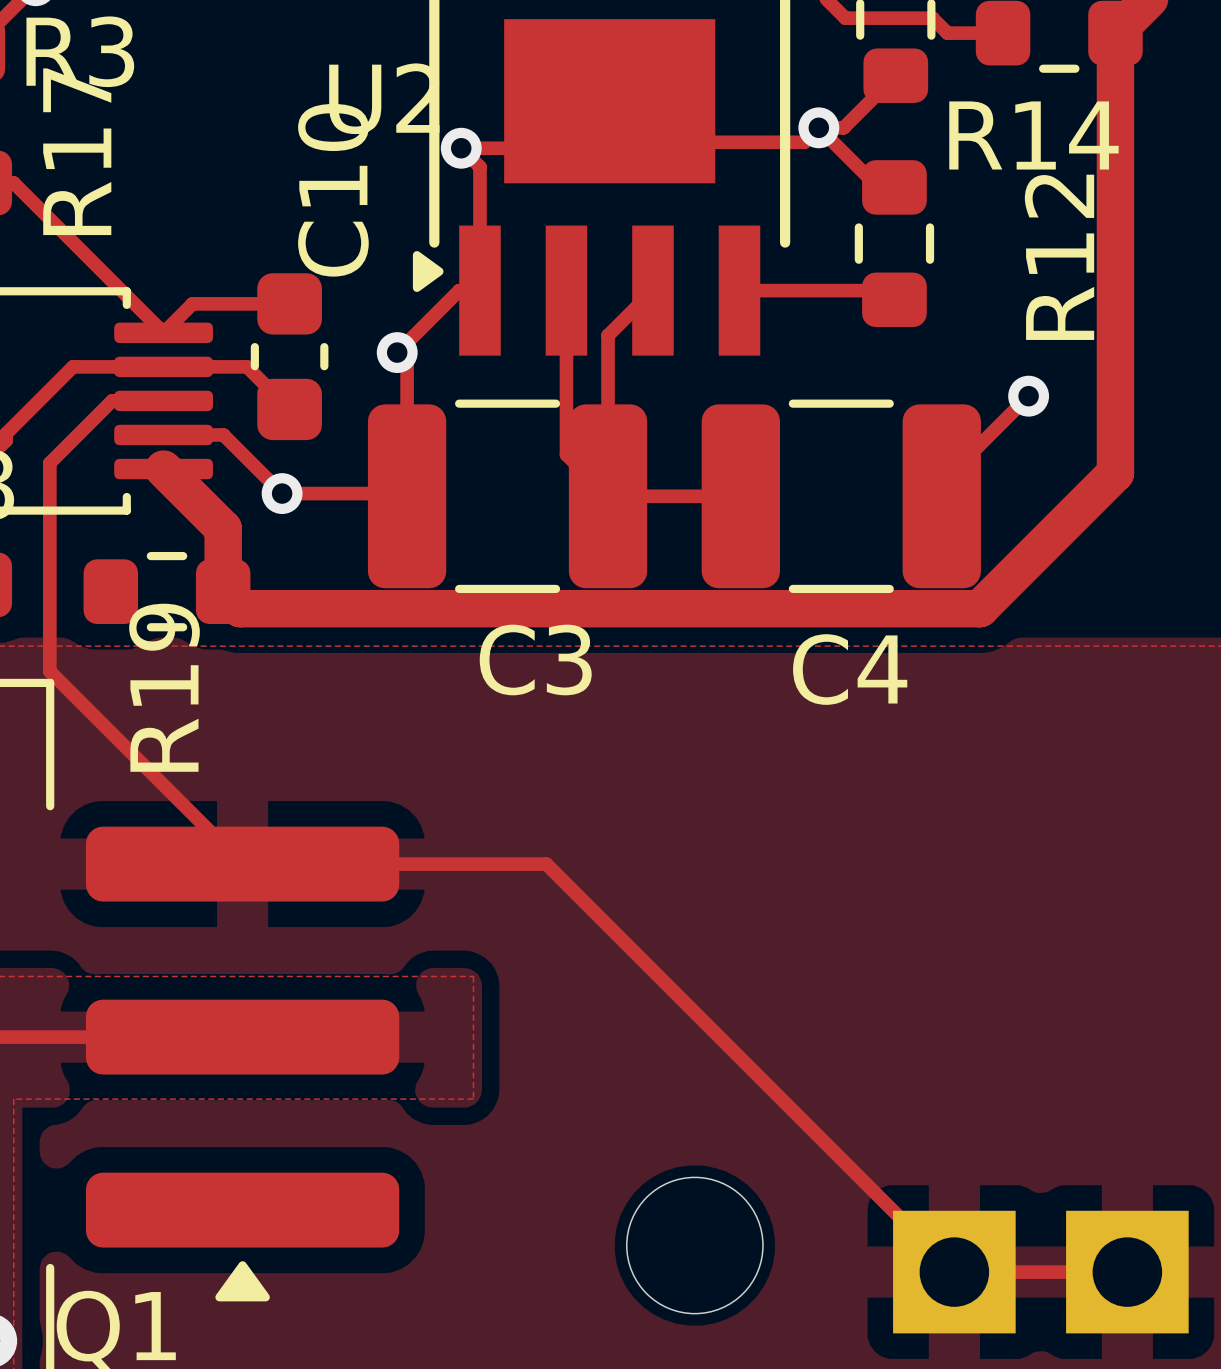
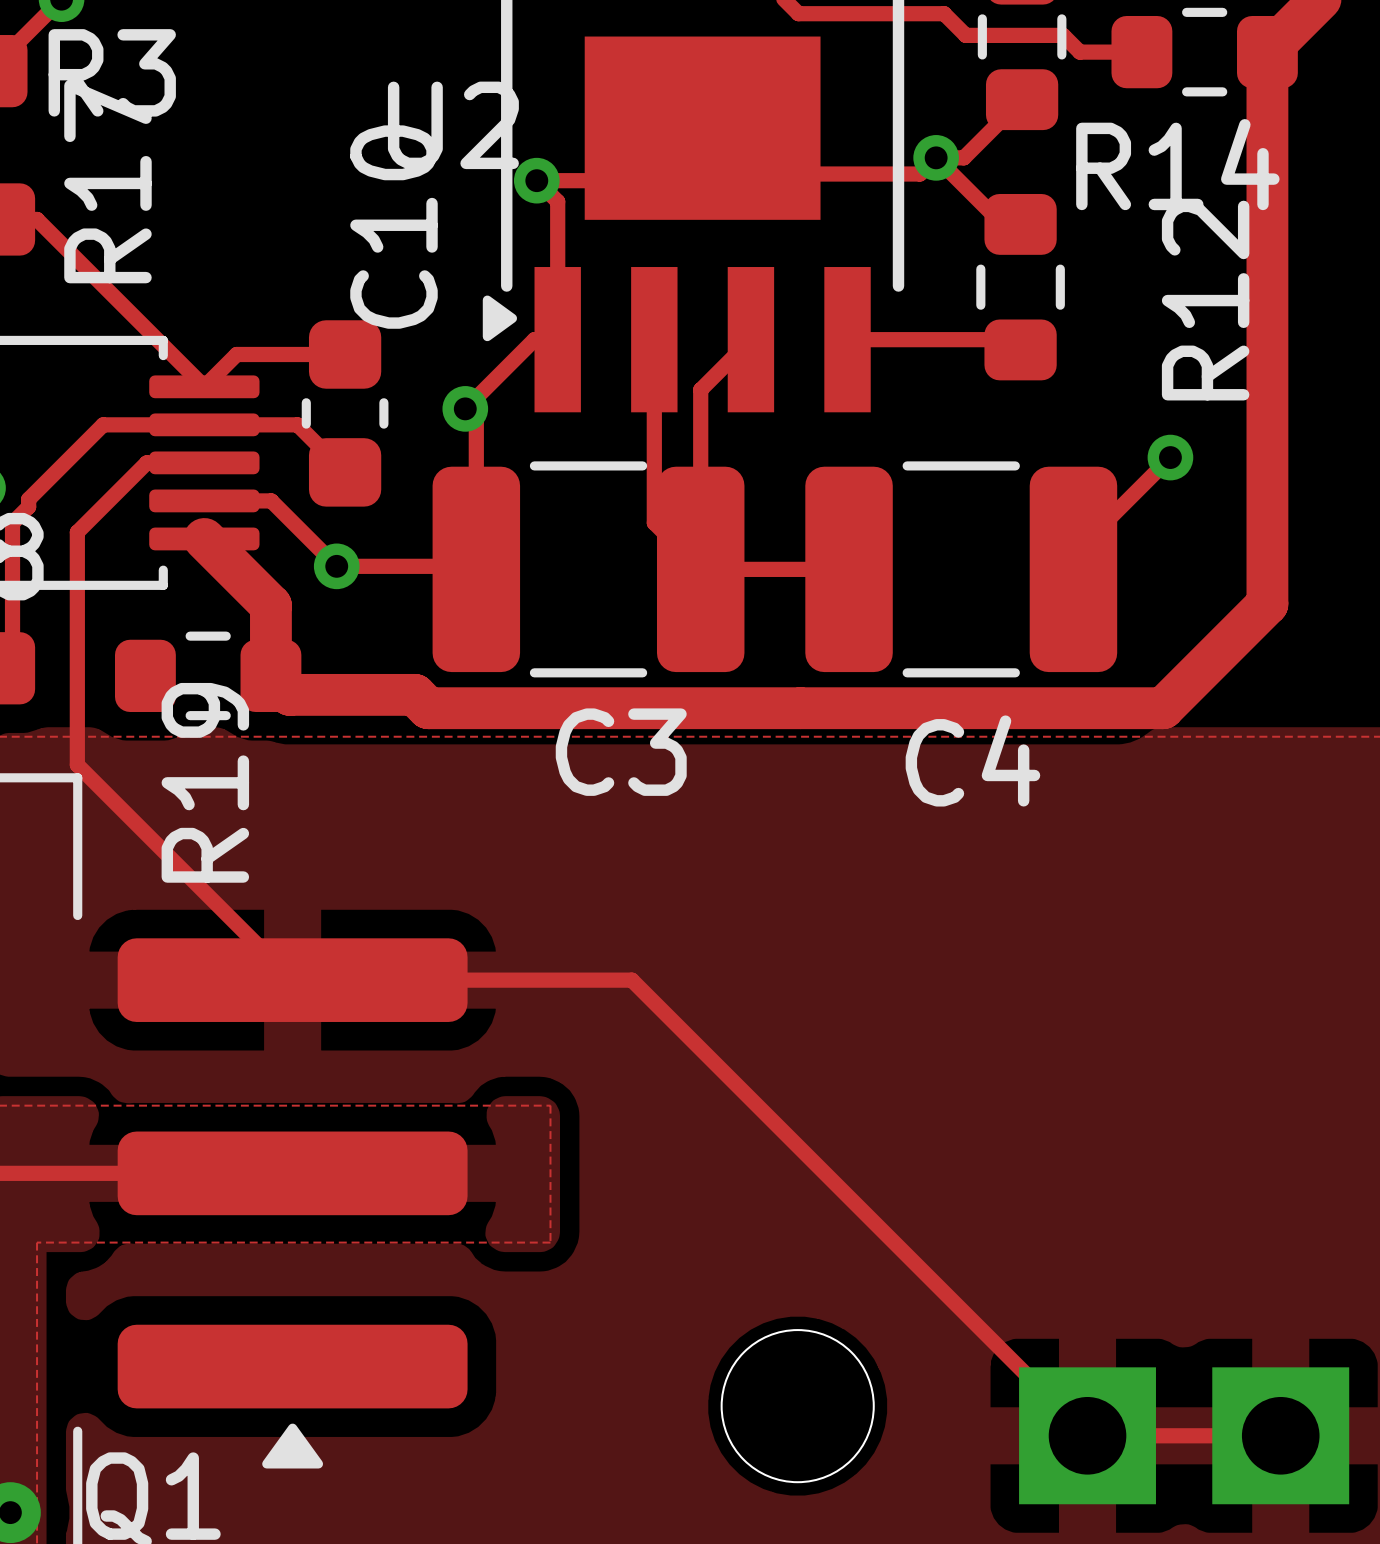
track: (1115, 473) (979, 608) (352, 608) -> (1267, 543) (1267, 603) (1163, 708) (428, 708) (414, 694)

